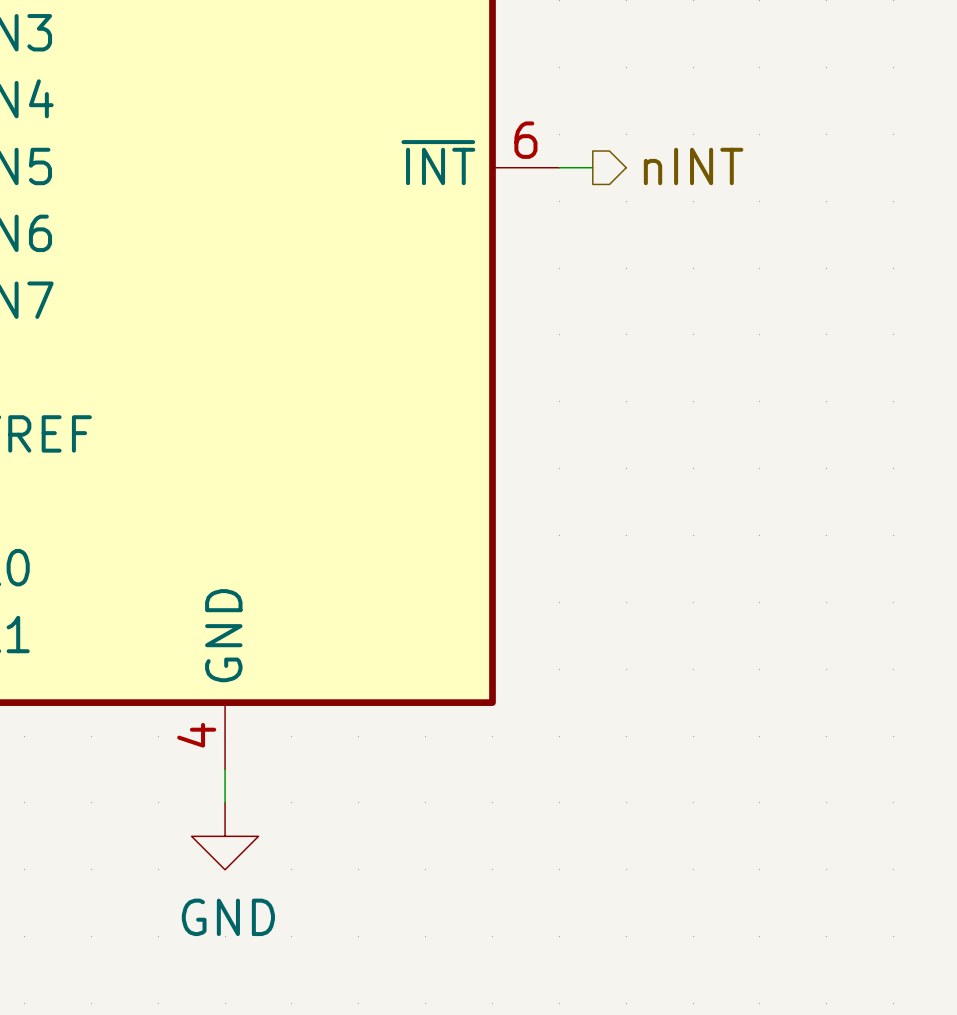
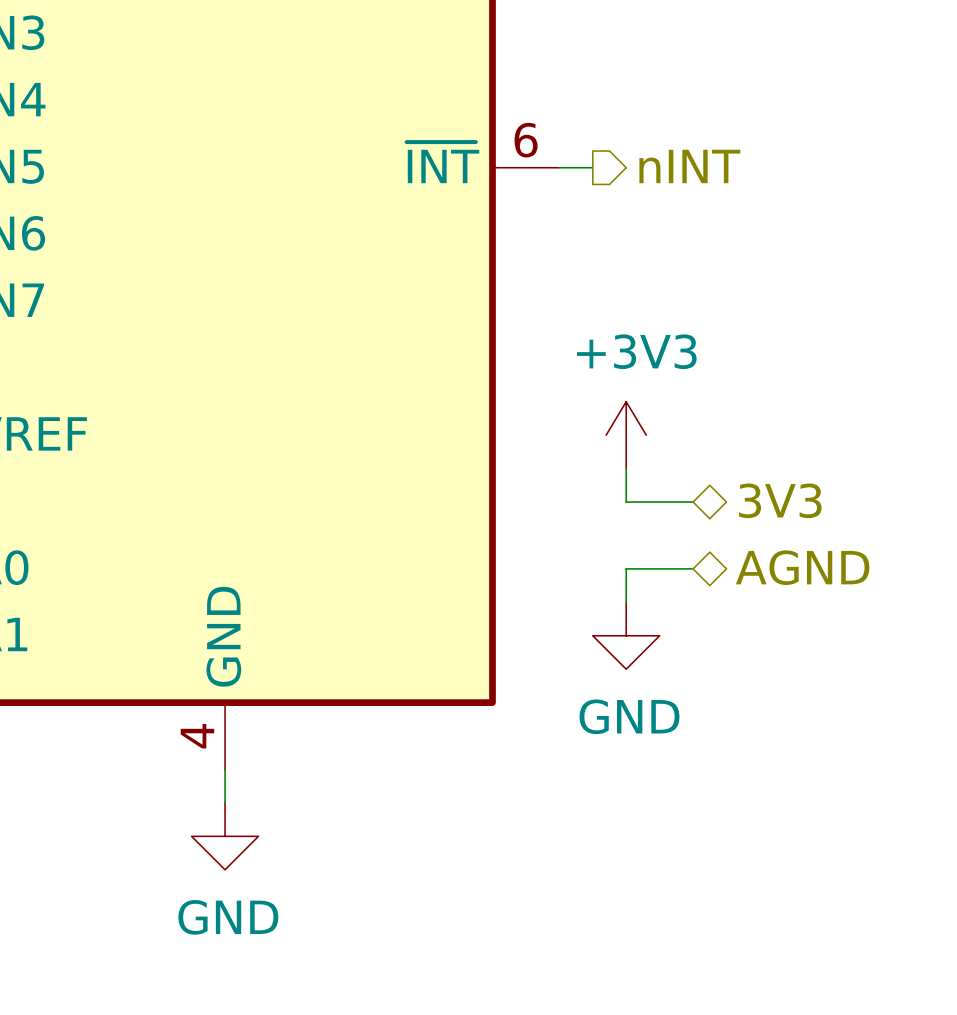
power symbol: none -> +3V3 (626, 435)
wire: none -> (626, 468) (626, 502) (693, 502)
hierarchical label: none -> 3V3 (780, 500)
hierarchical label: none -> AGND (802, 567)
wire: none -> (693, 568) (626, 568) (626, 602)
power symbol: none -> GND (626, 635)

